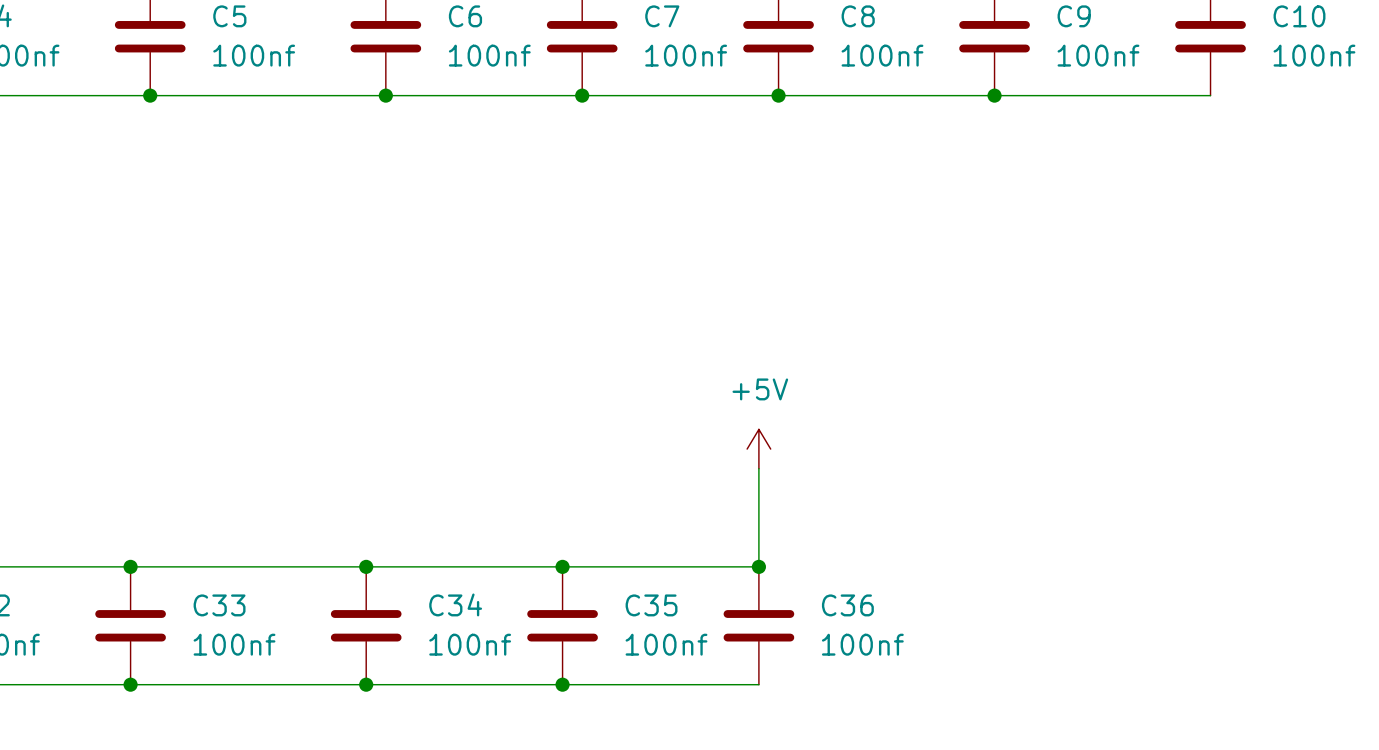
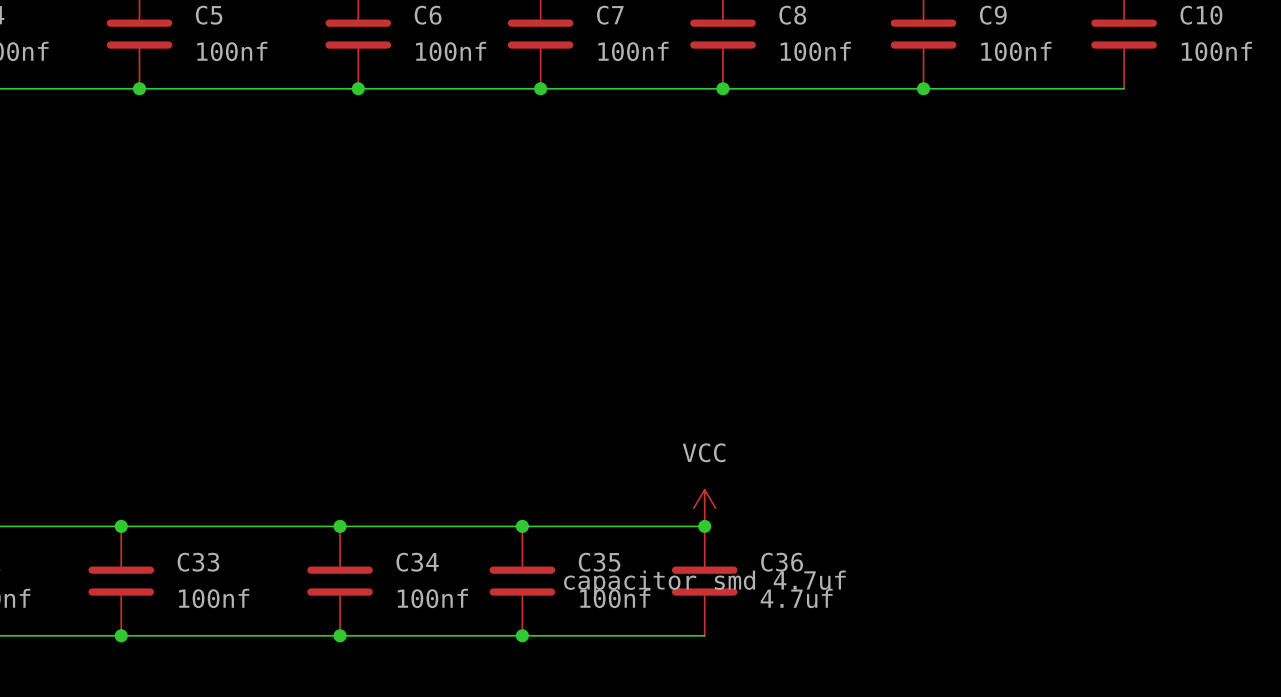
power symbol: +5V (758, 449) -> none
wire: (758, 468) (758, 566) -> none
power symbol: none -> VCC (704, 508)
C36 text: none -> capacitor smd 4.7uf (704, 582)
C36 value: 100nf (862, 644) -> 4.7uf (796, 598)

